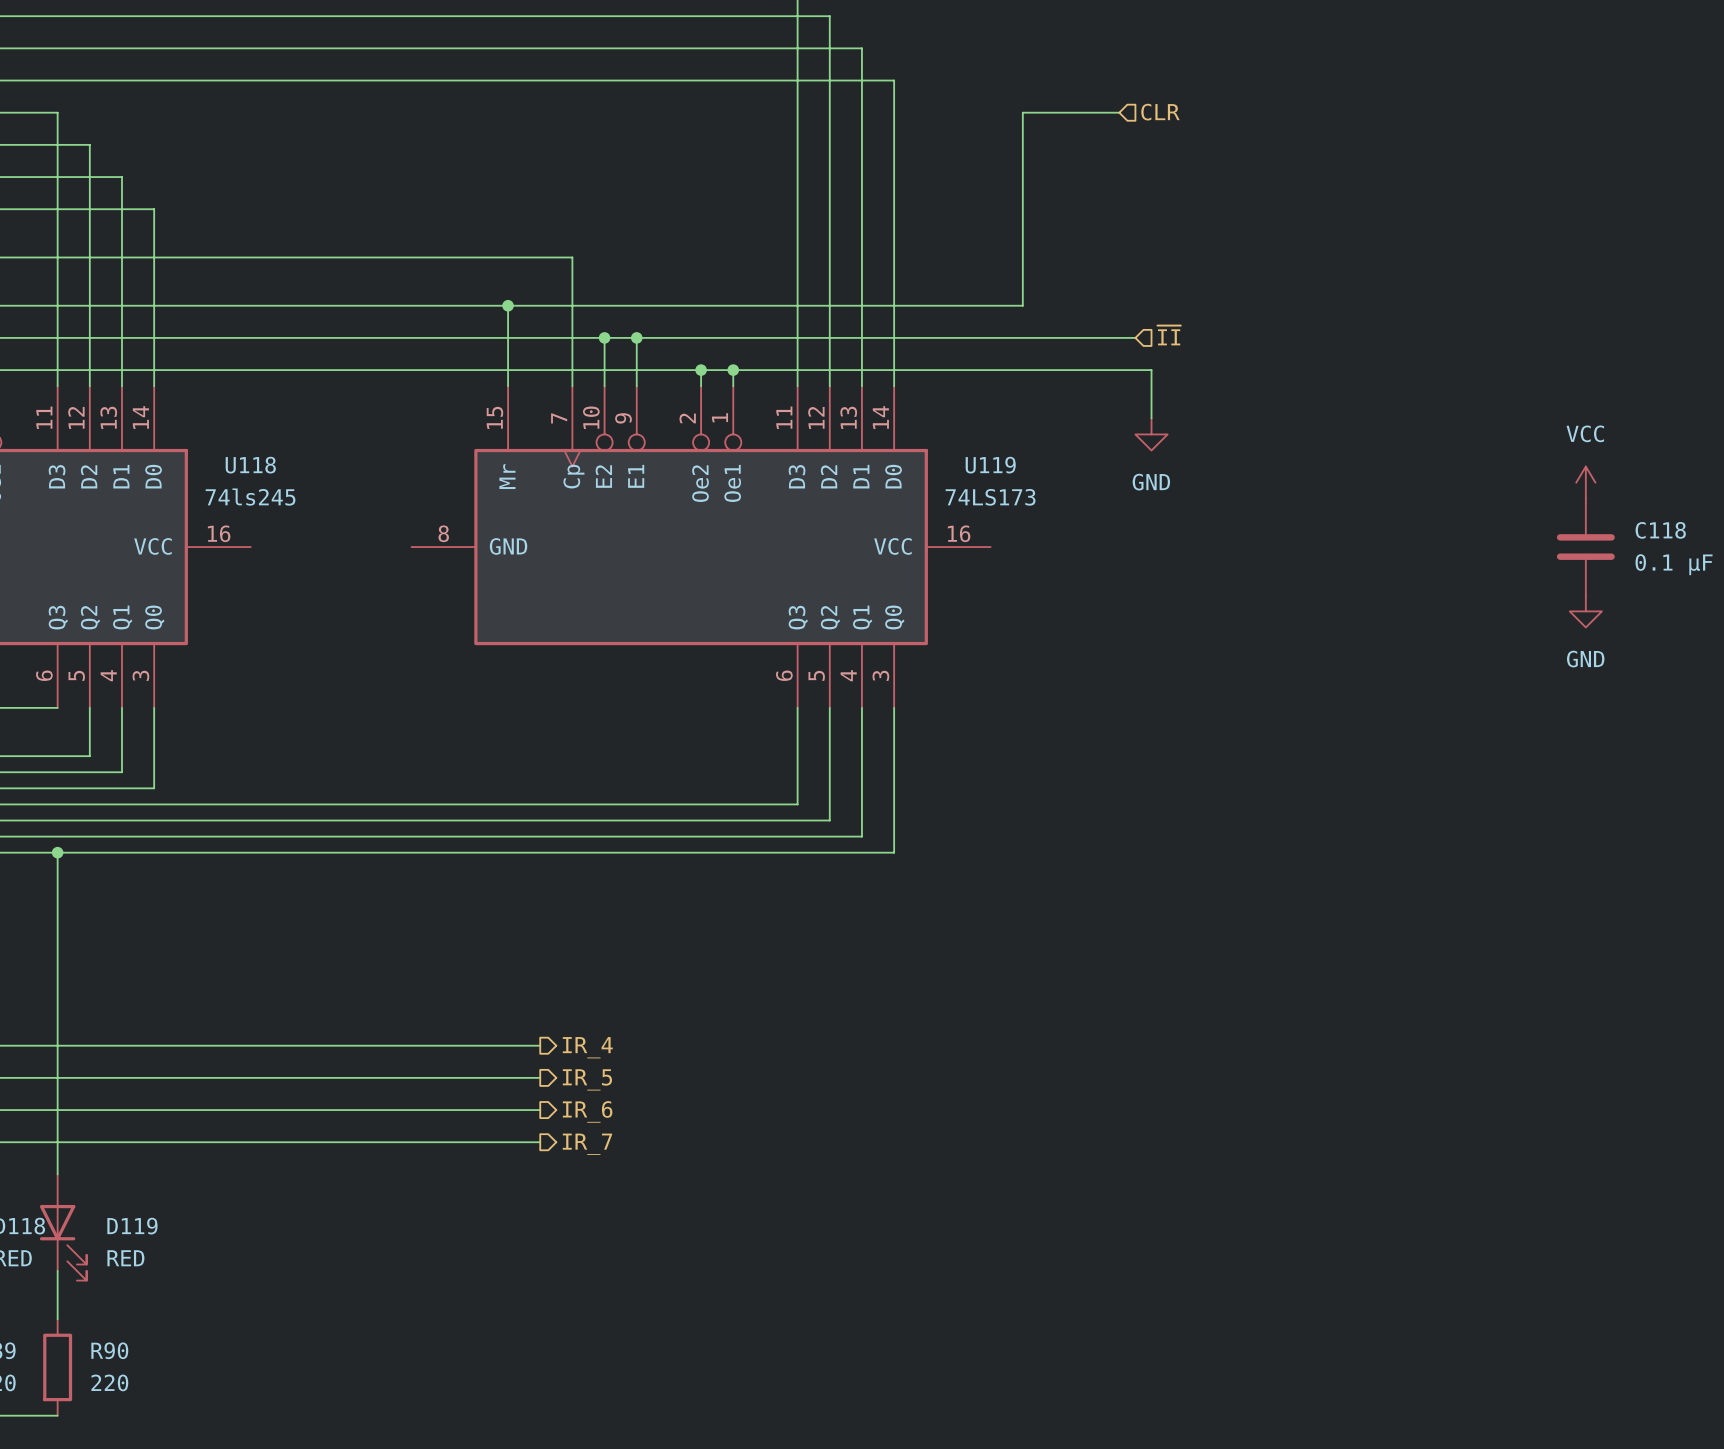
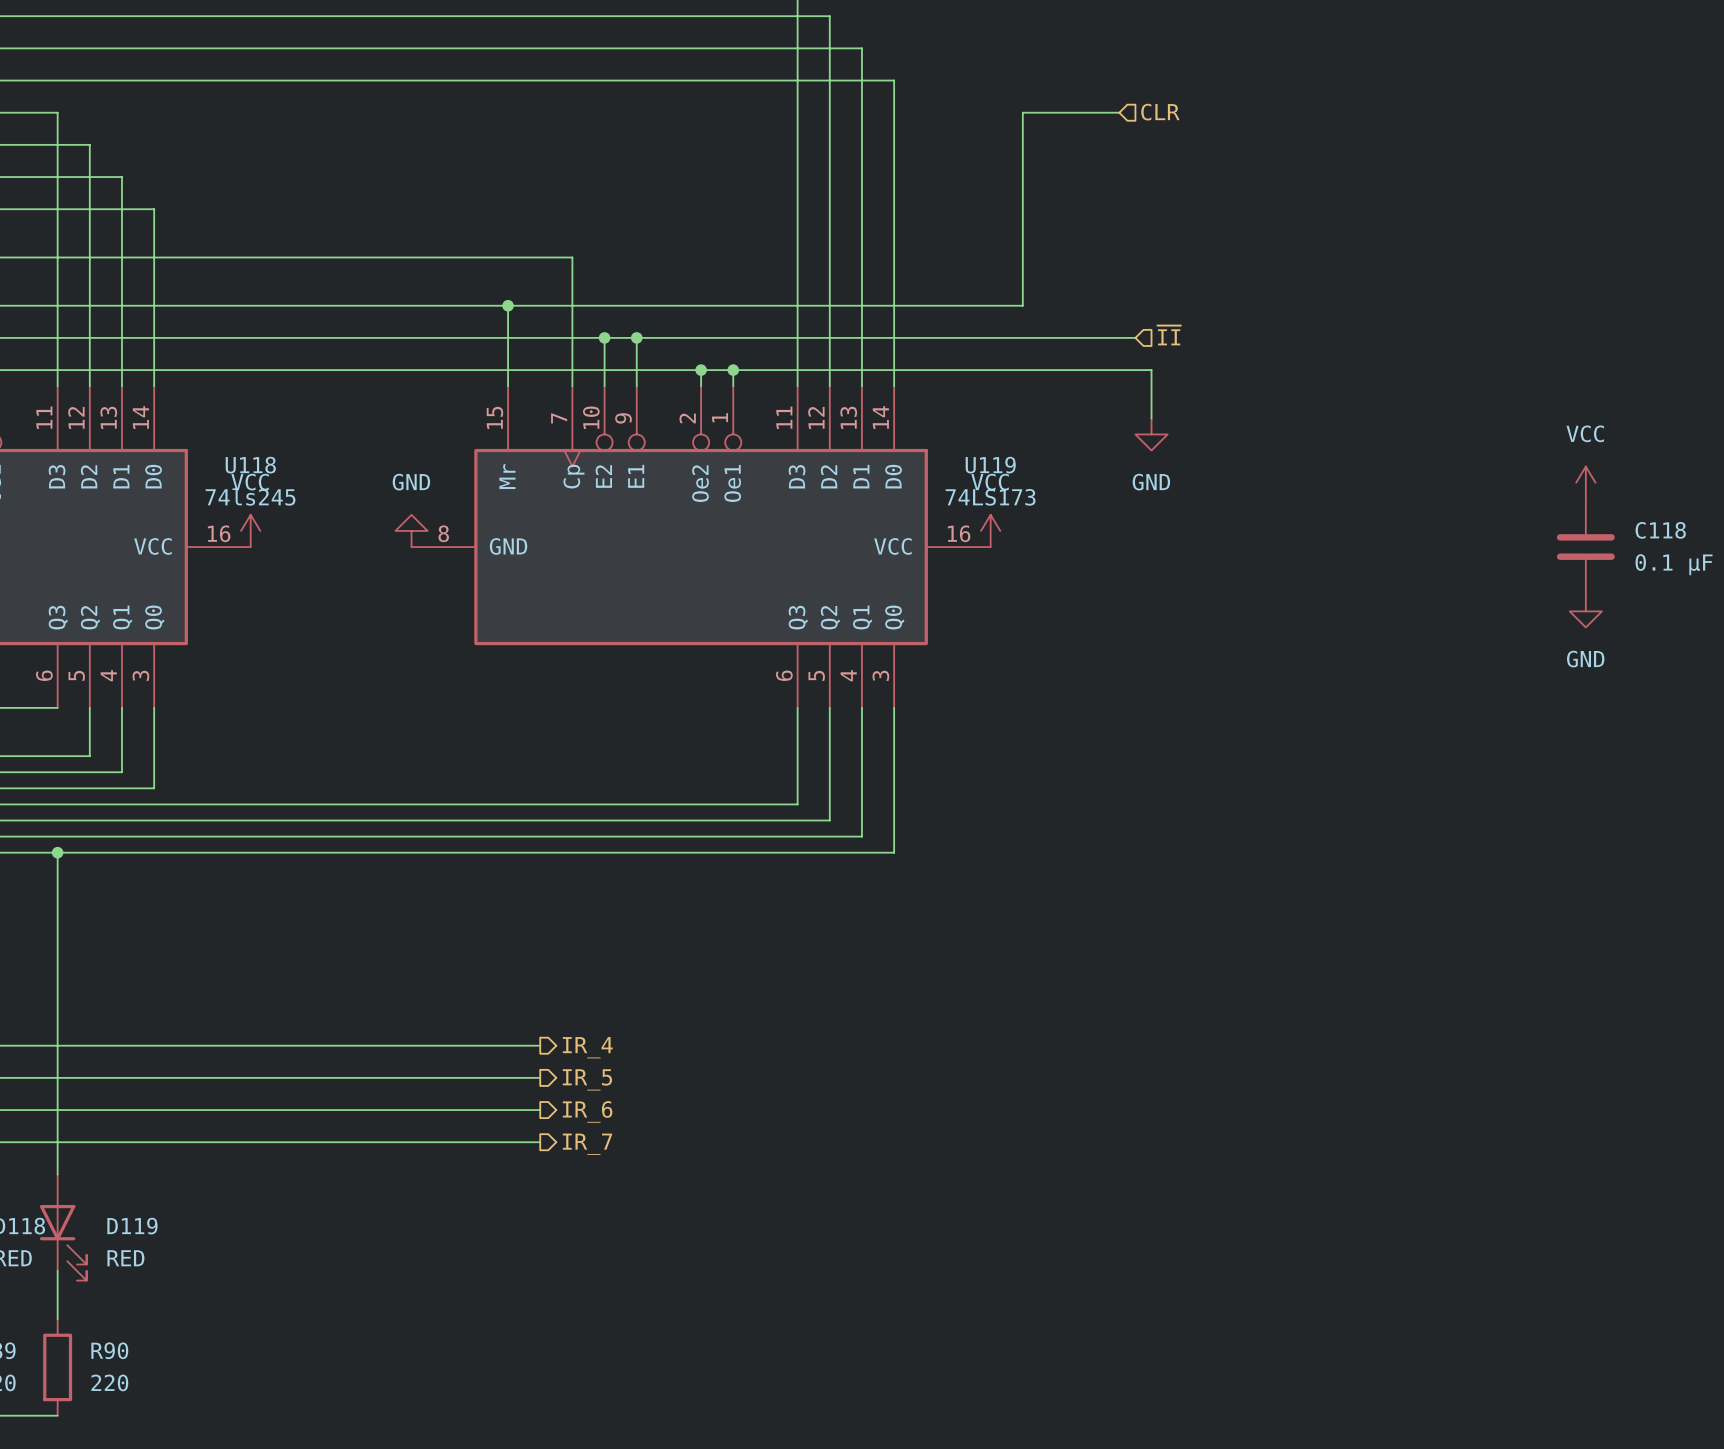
power symbol: none -> VCC (250, 530)
power symbol: none -> GND (411, 530)
power symbol: none -> VCC (990, 530)

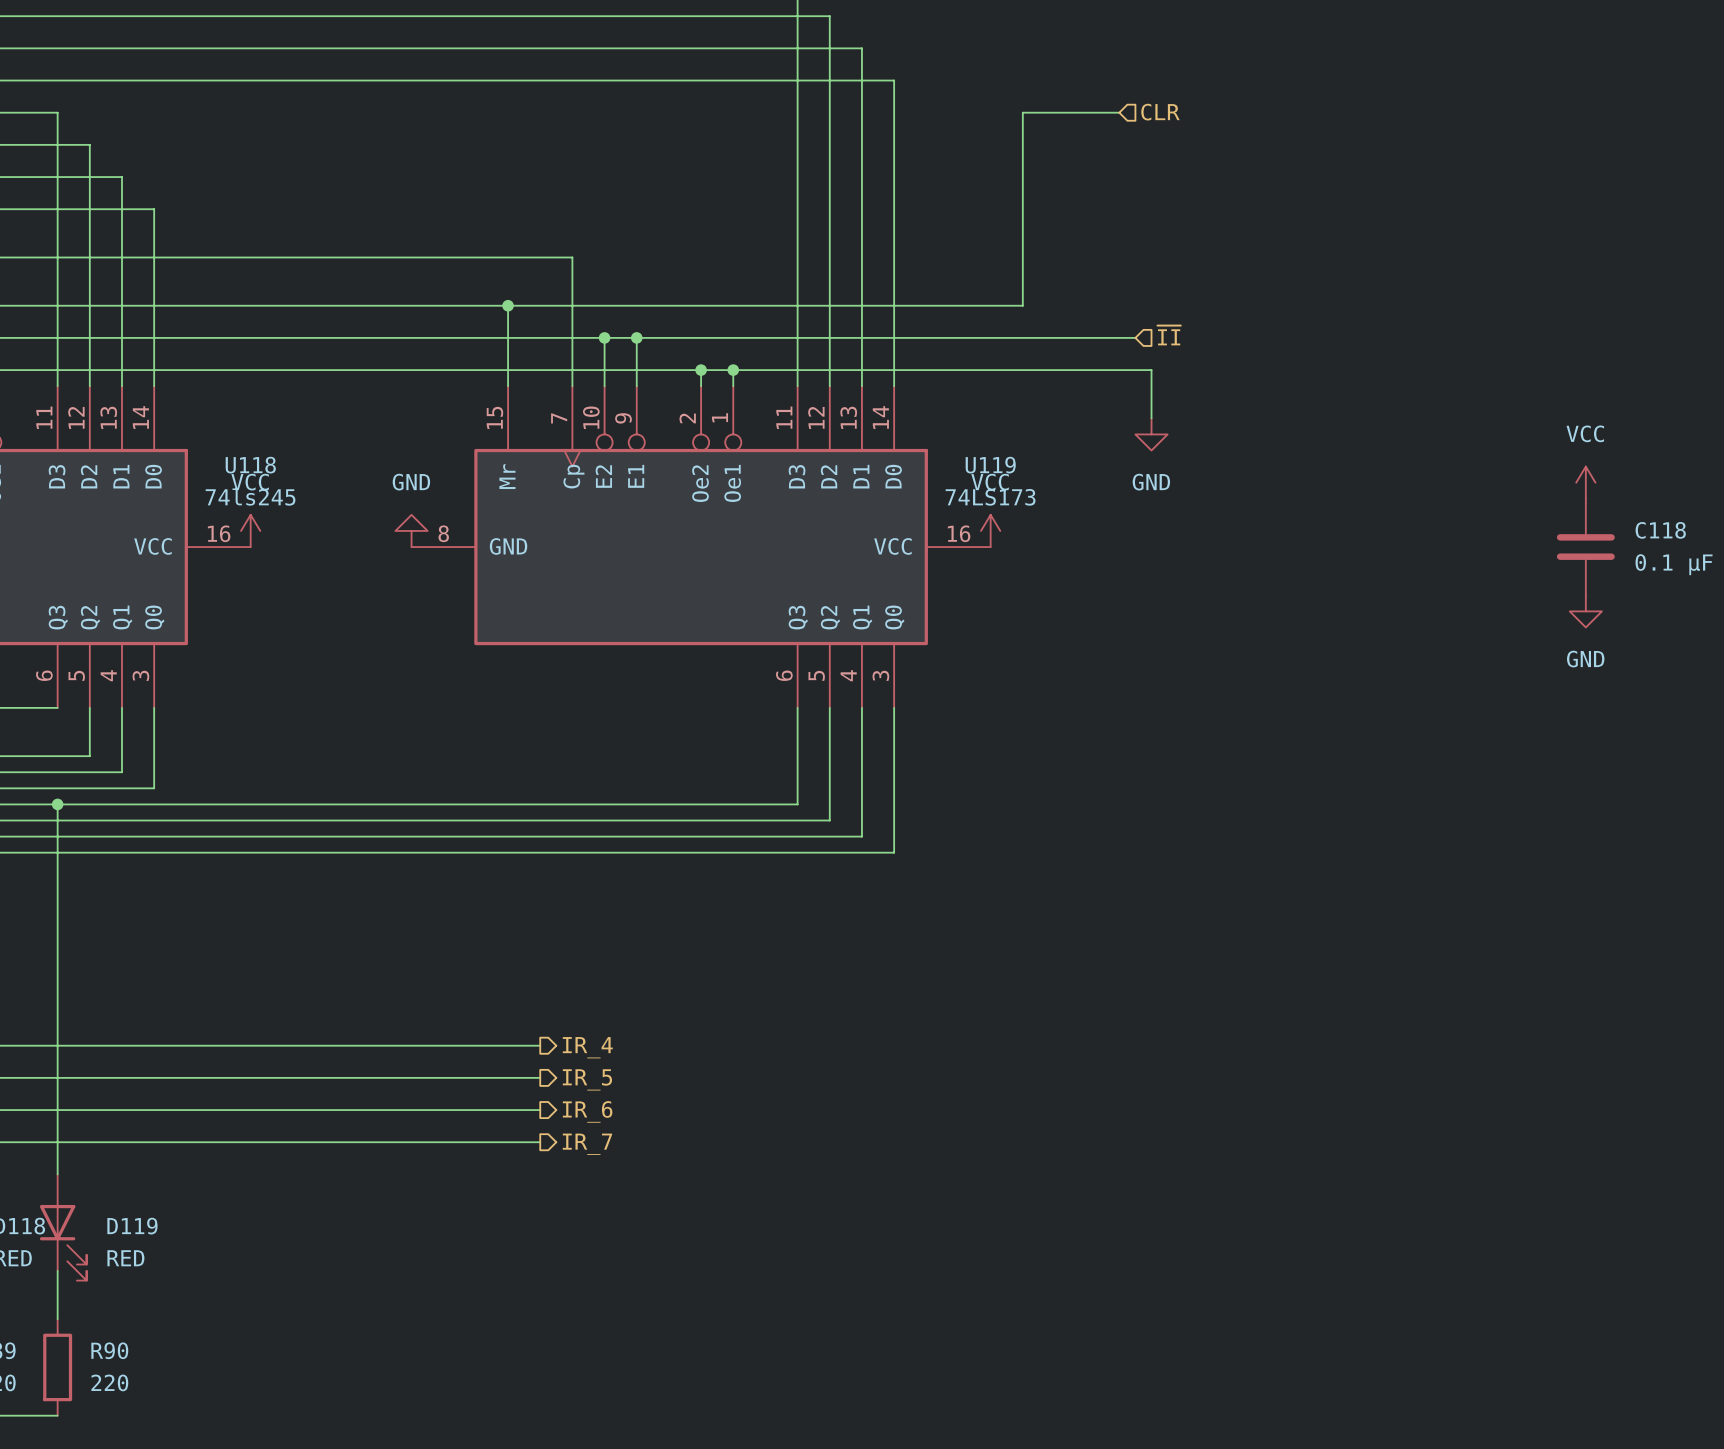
wire: none -> (57, 804) (57, 852)
junction position: (57, 852) -> (57, 804)

